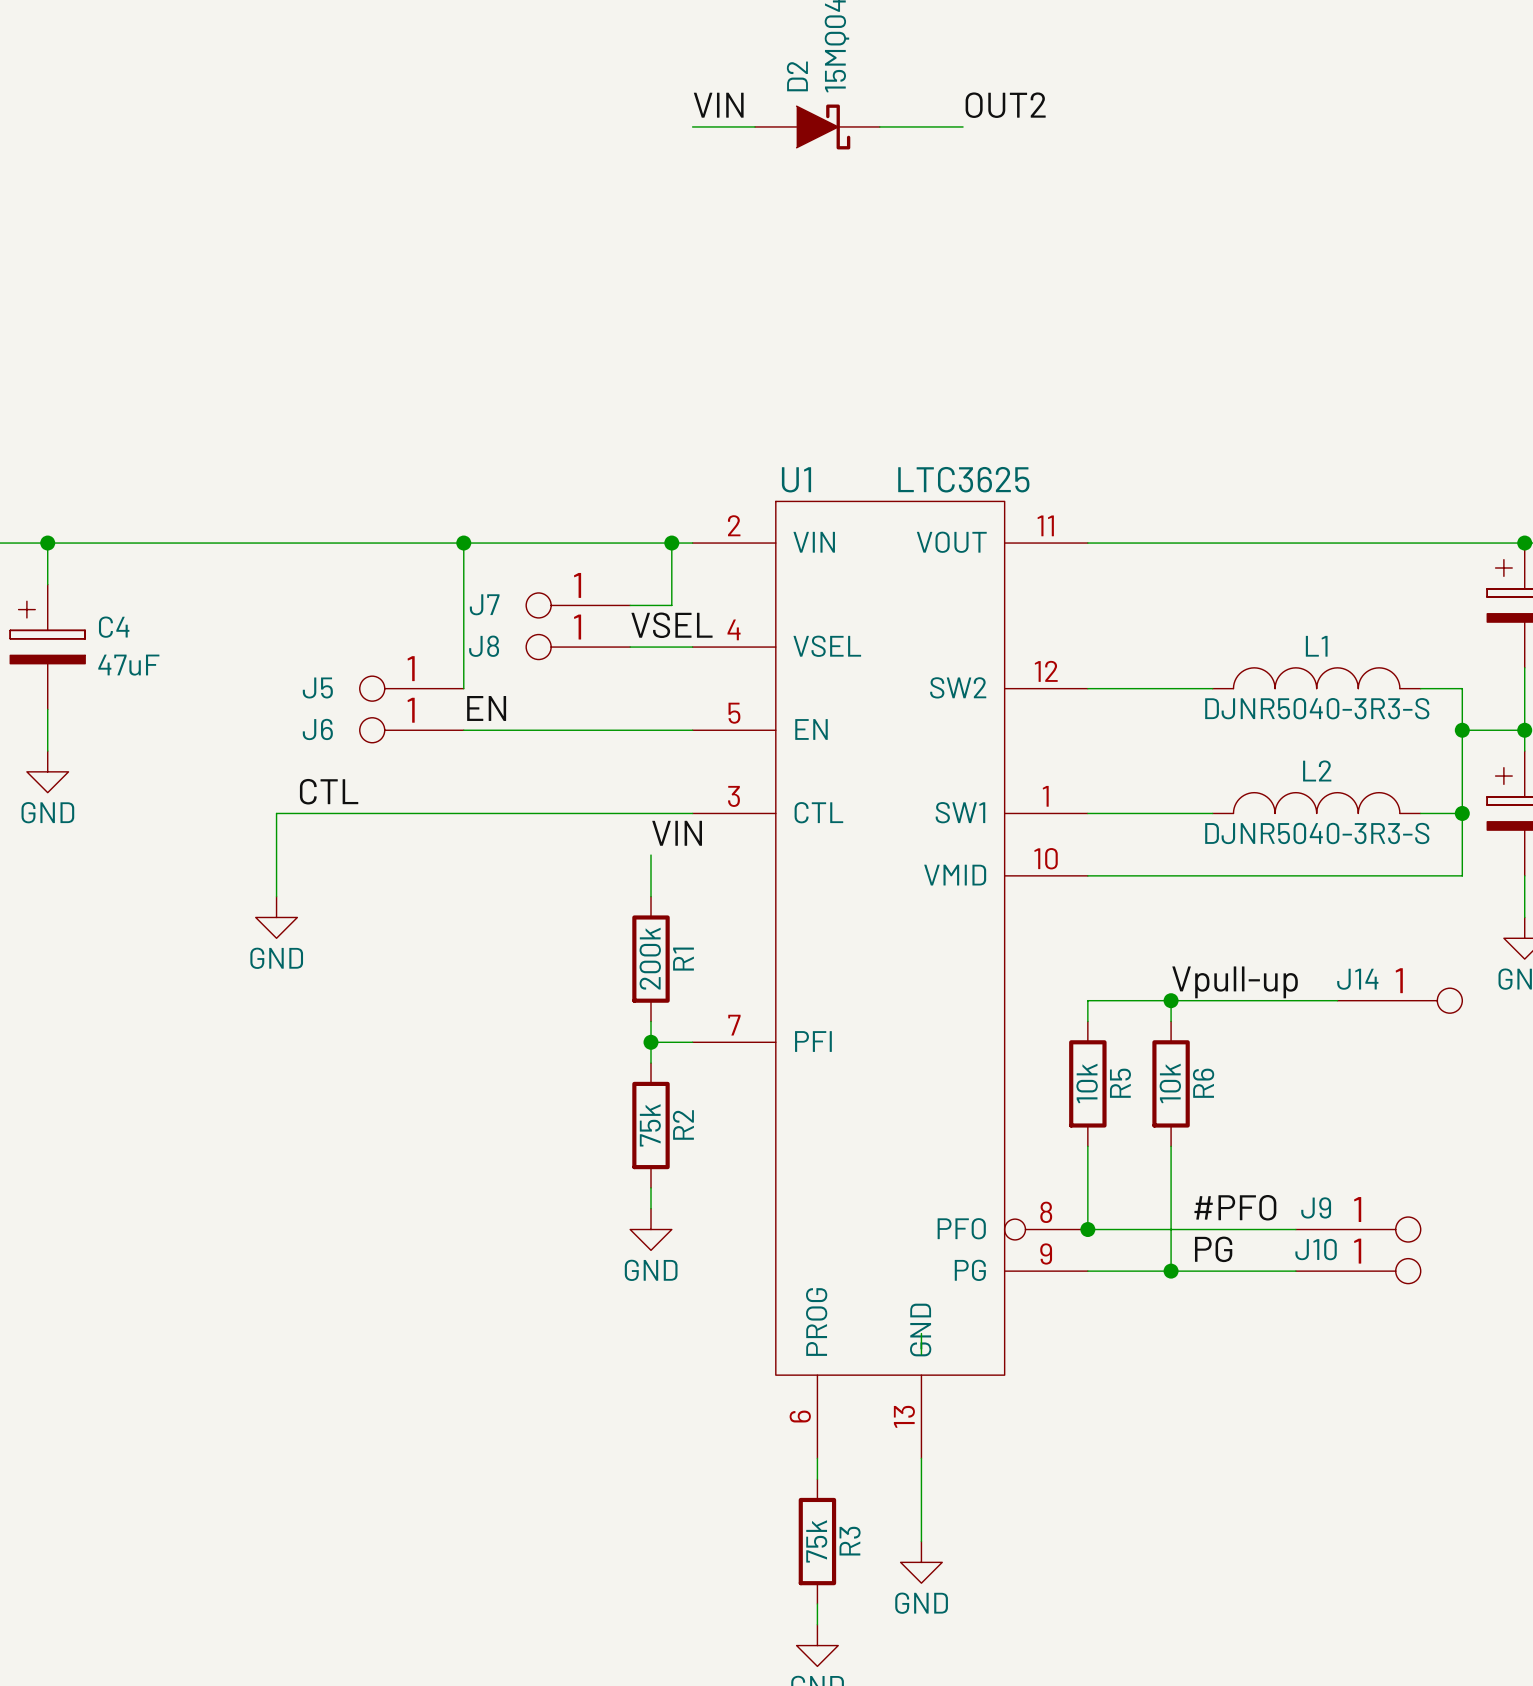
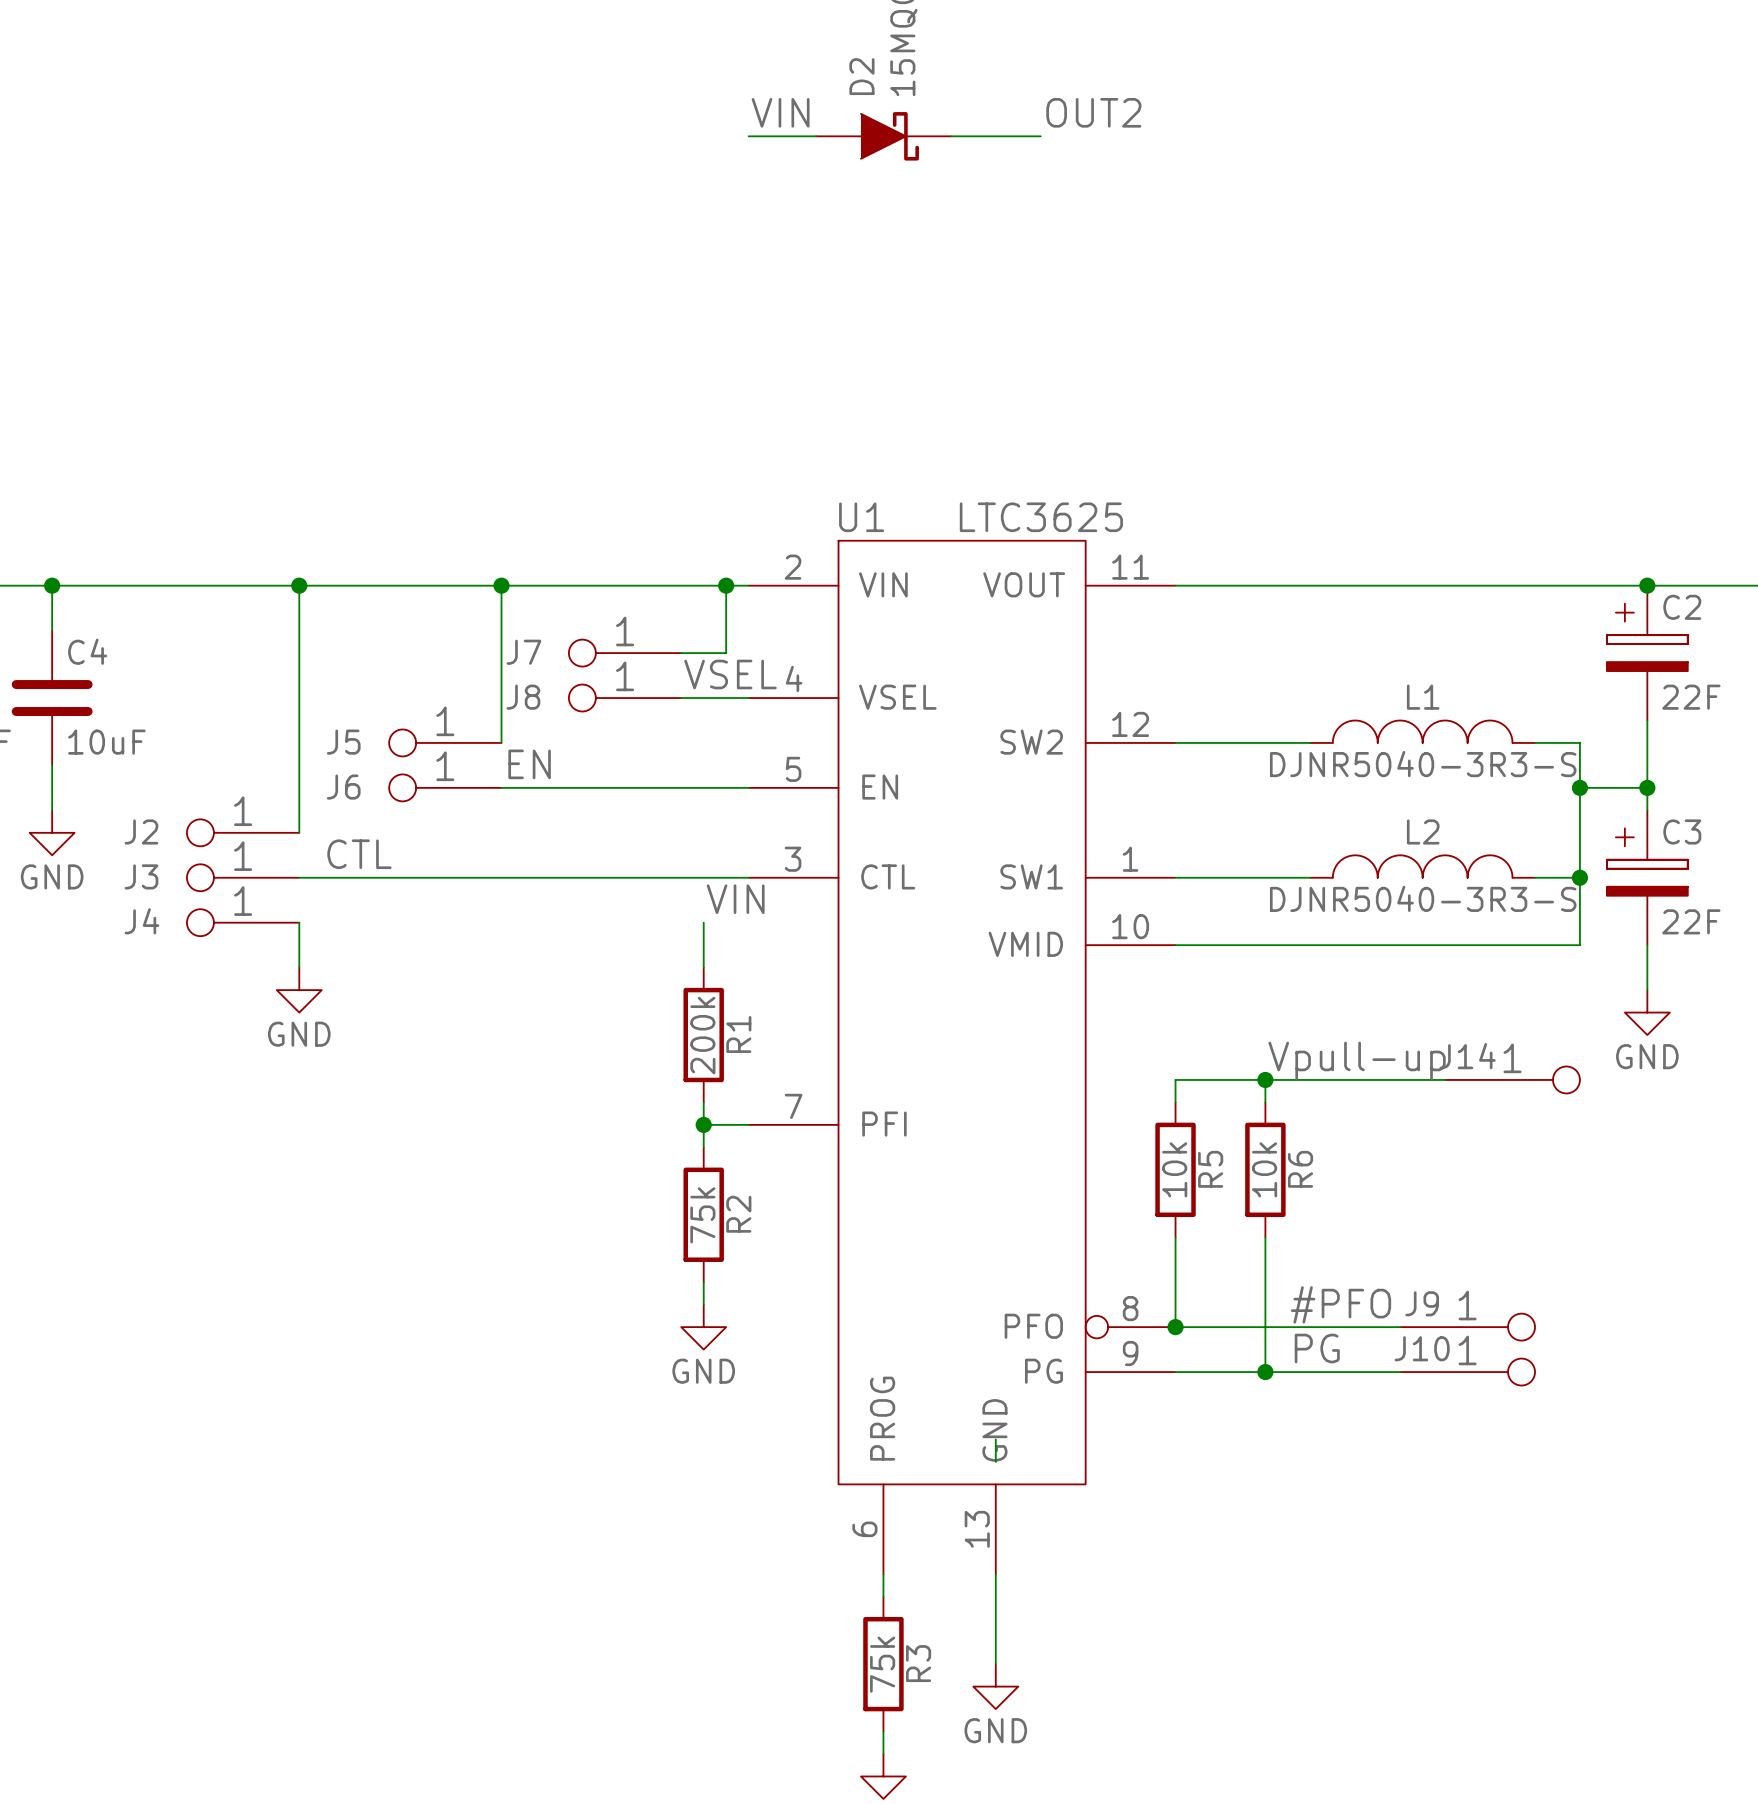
wire: none -> (299, 585) (299, 832)
junction: none -> (299, 585)
C4 symbol: [10, 584, 86, 710] -> [11, 630, 93, 766]
C4 name position: C4 (114, 627) -> C4 (87, 651)
C4 value: 47uF (128, 665) -> 10uF (106, 742)
J2: none -> (243, 832)
J3: none -> (243, 877)
wire: (276, 813) (276, 855) -> none
J4: none -> (243, 922)

